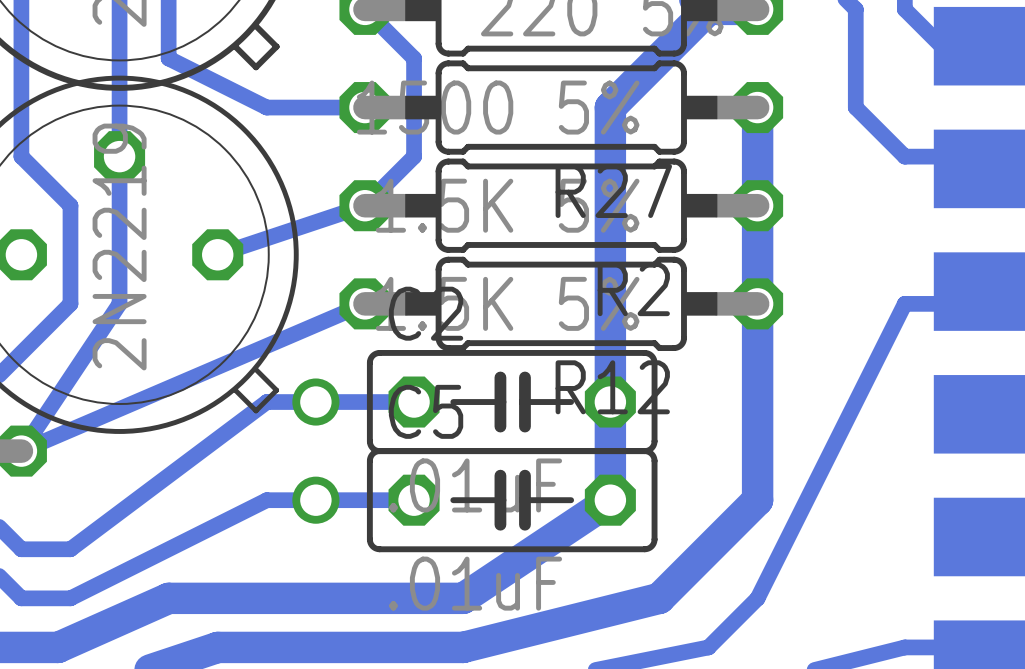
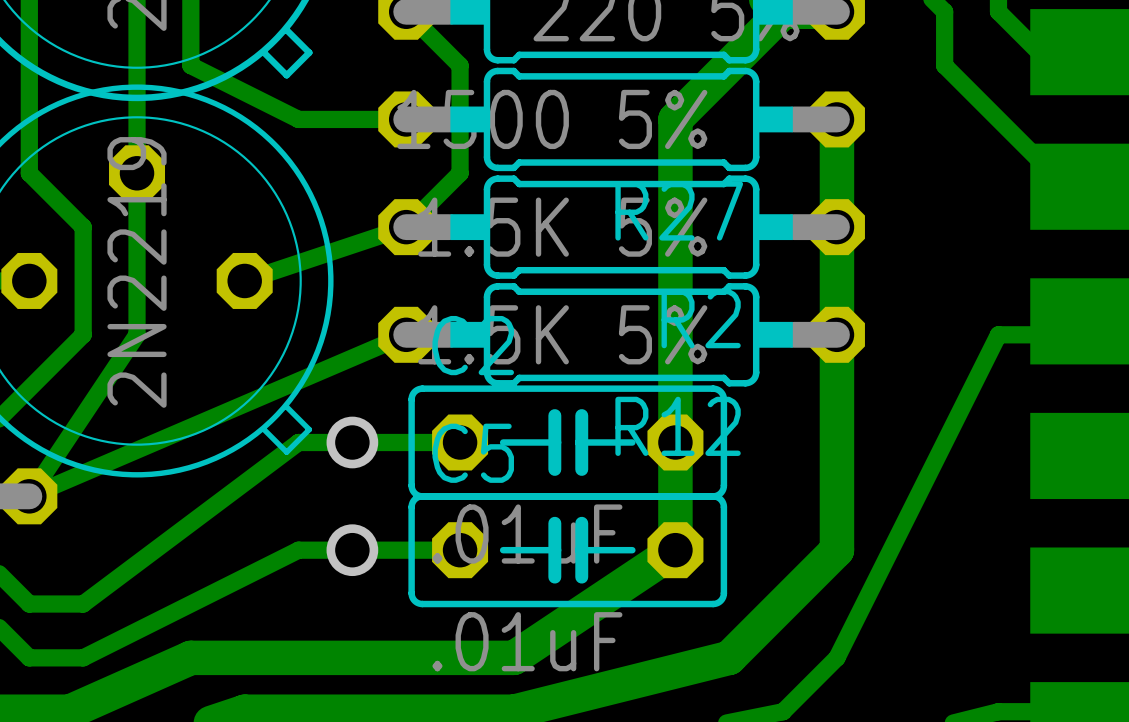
bottom track: (855, 58) (855, 107) (904, 156) (953, 156) -> (944, 65) (1052, 173)

